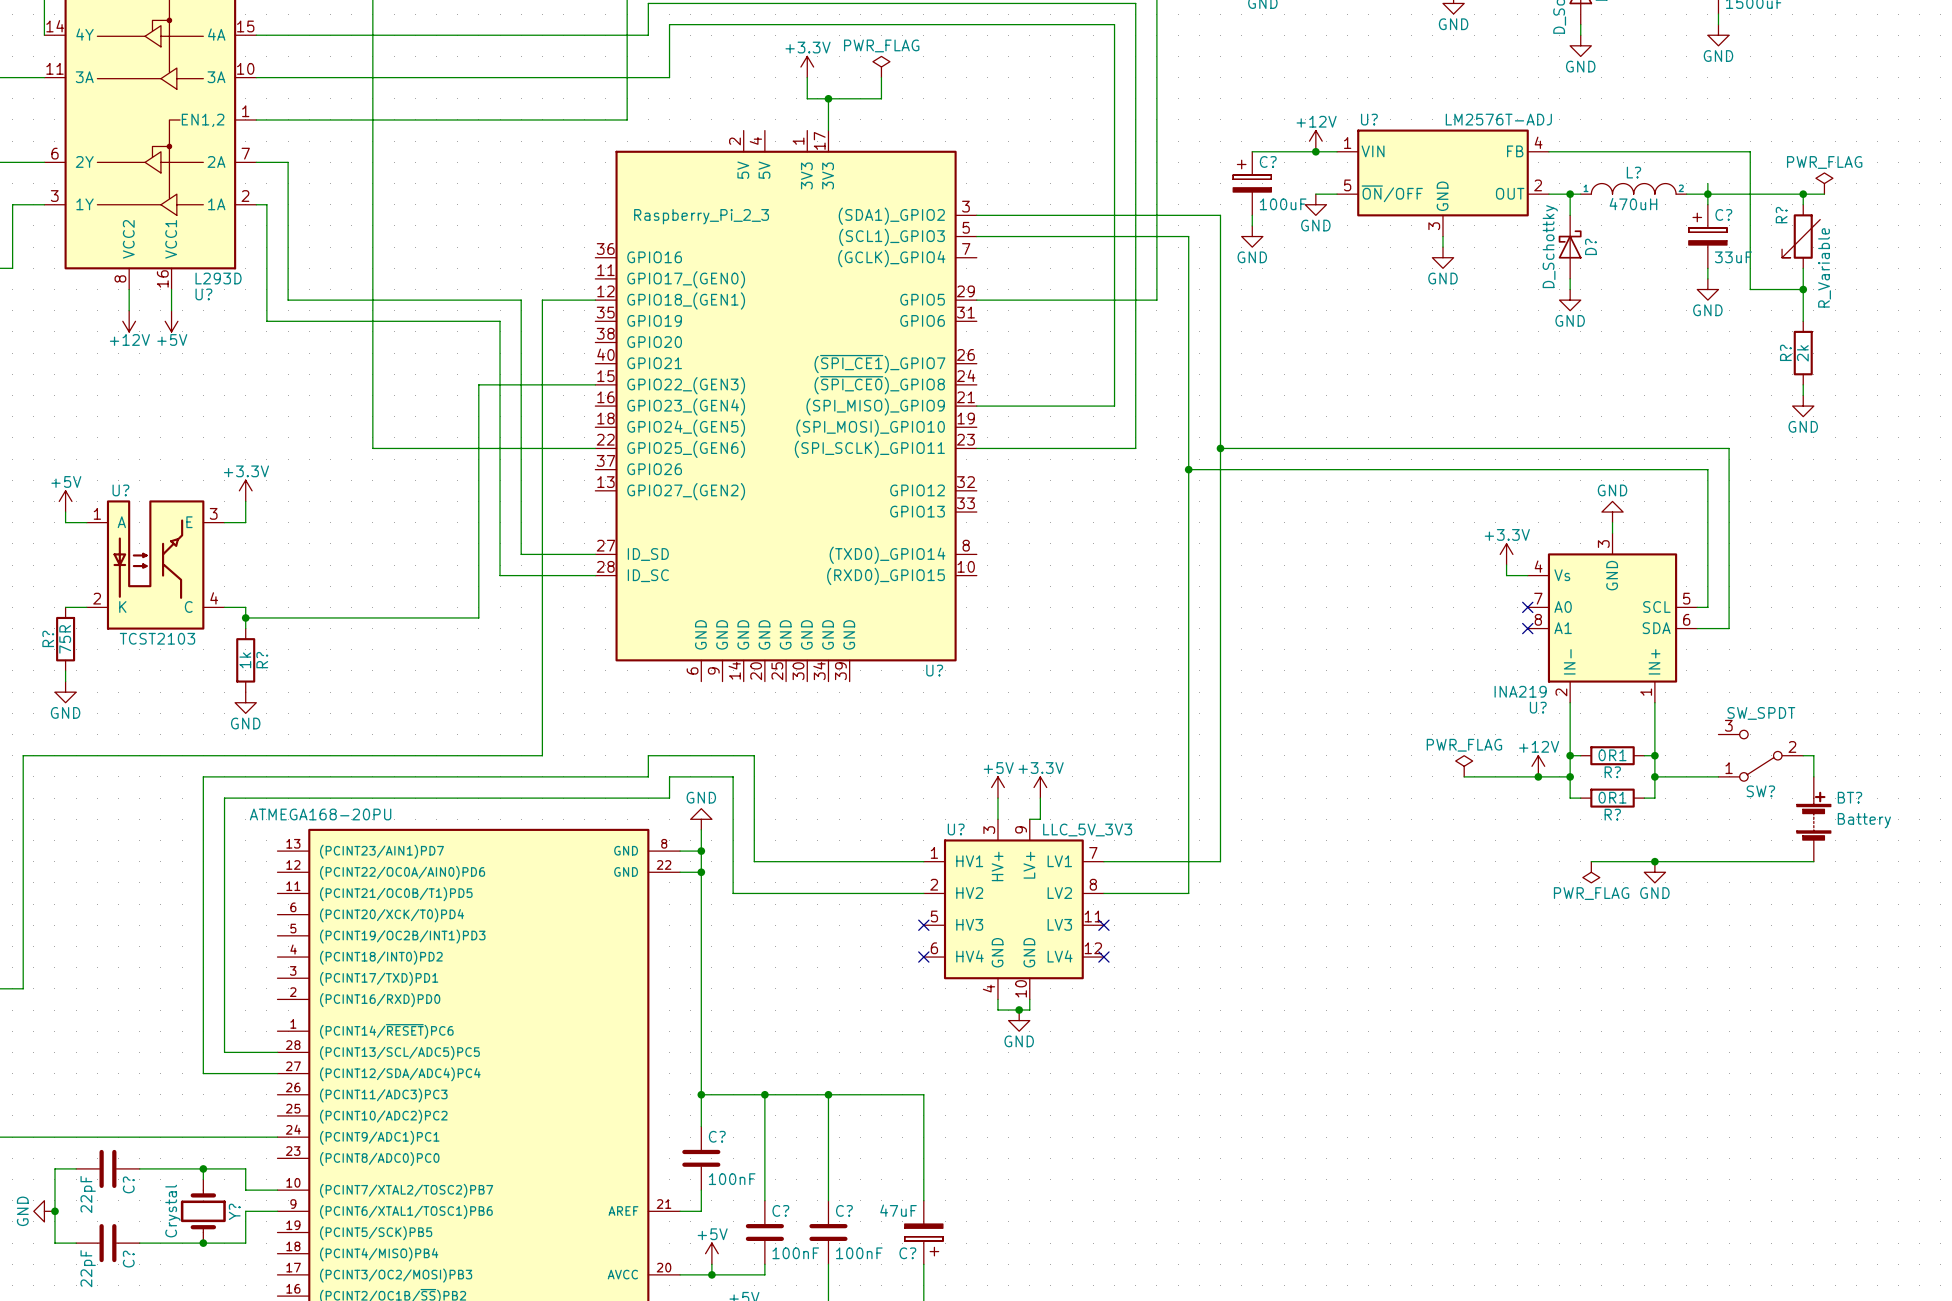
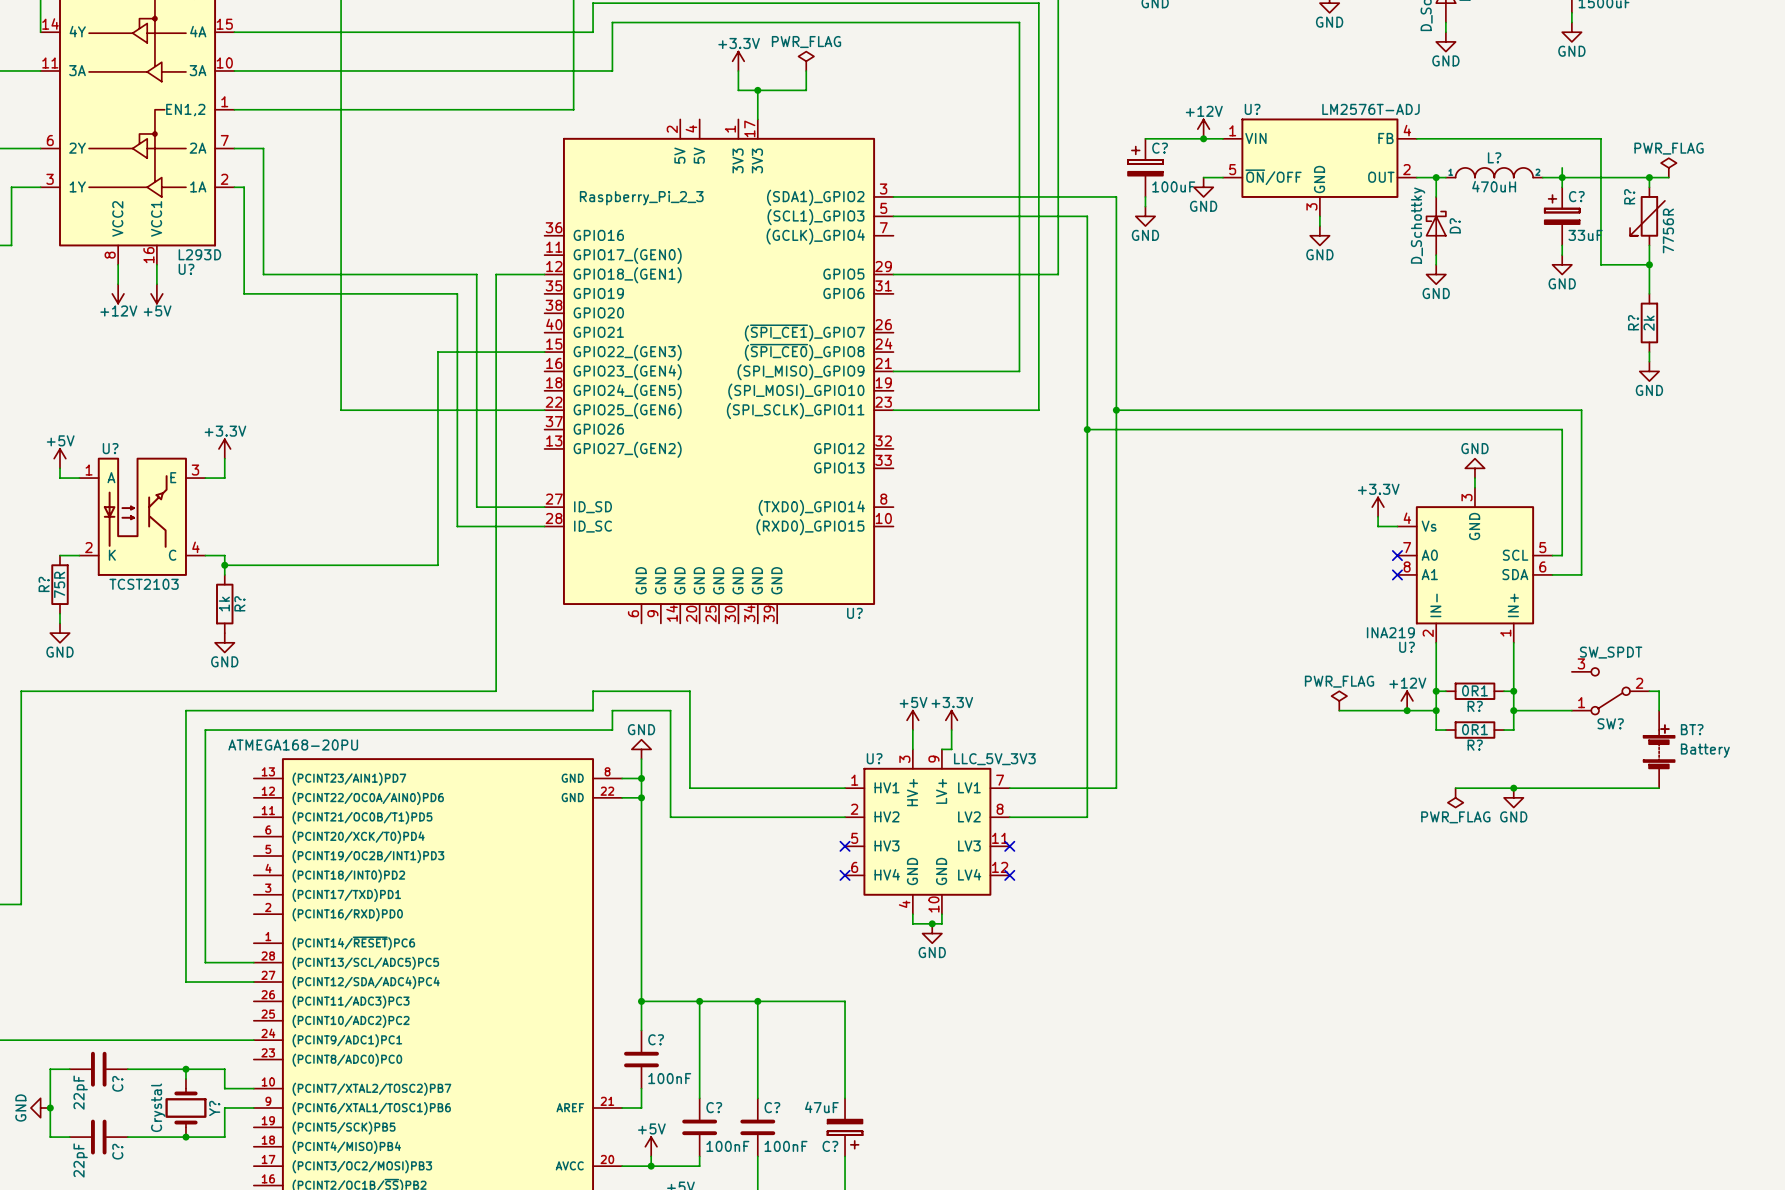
R? value: R_Variable (1824, 267) -> 7756R (1668, 230)

